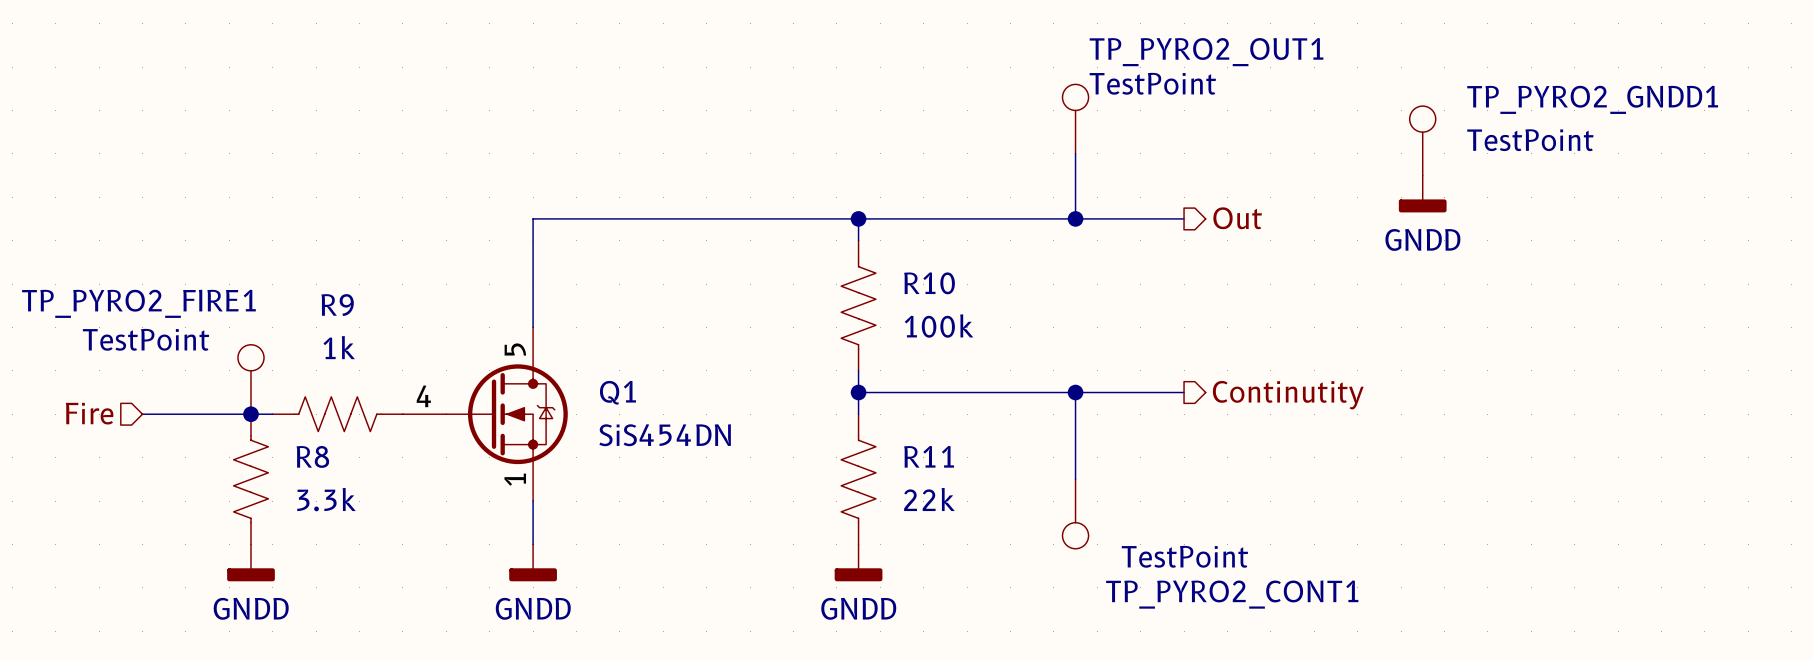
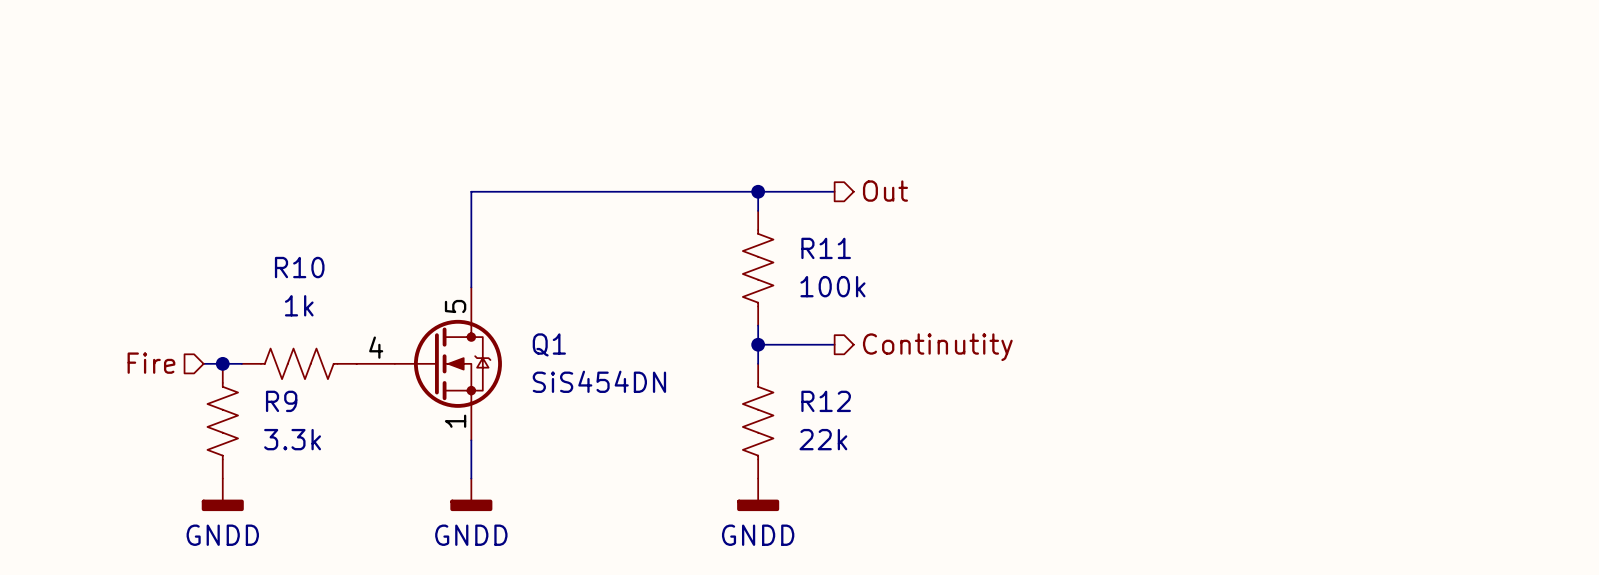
TP_PYRO2_OUT1: TestPoint (1075, 119) -> none
TP_PYRO2_GNDD1: TestPoint (1422, 140) -> none
wire: (1075, 153) (1075, 218) -> none
power symbol: GNDD (1422, 193) -> none
wire: (945, 218) (1184, 218) -> none
junction: (1075, 218) -> none
hierarchical label position: Out (1237, 218) -> Out (885, 191)
R10 name: R10 (929, 283) -> R11 (826, 248)
R9 name: R9 (337, 305) -> R10 (299, 267)
TP_PYRO2_FIRE1: TestPoint (250, 379) -> none
wire: (945, 392) (1184, 392) -> none
wire: (1075, 392) (1075, 479) -> none
junction: (1075, 392) -> none
hierarchical label position: Continutity (1288, 395) -> Continutity (937, 347)
hierarchical label position: Fire (89, 413) -> Fire (151, 363)
wire: (142, 414) (229, 414) -> none
R8 name: R8 (312, 456) -> R9 (281, 401)
R11 name: R11 (929, 456) -> R12 (826, 401)
TP_PYRO2_CONT1: TestPoint (1075, 514) -> none

